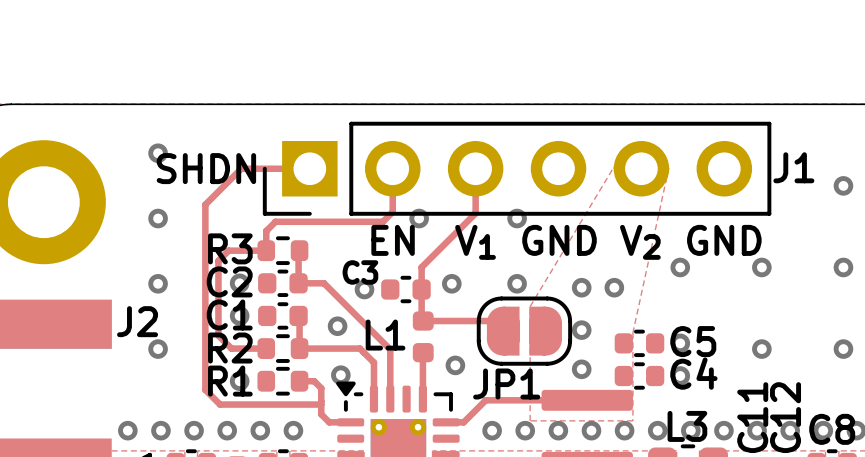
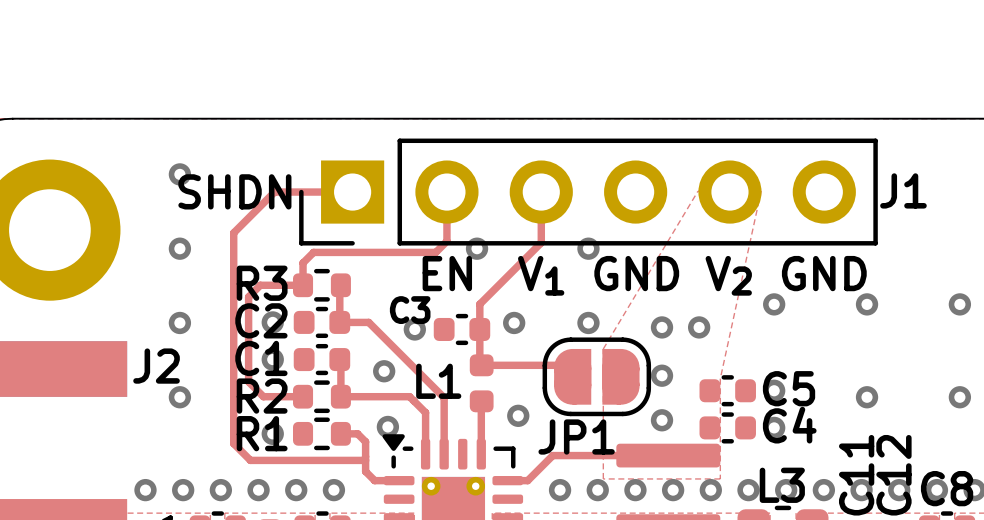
via: (843, 185) -> none

